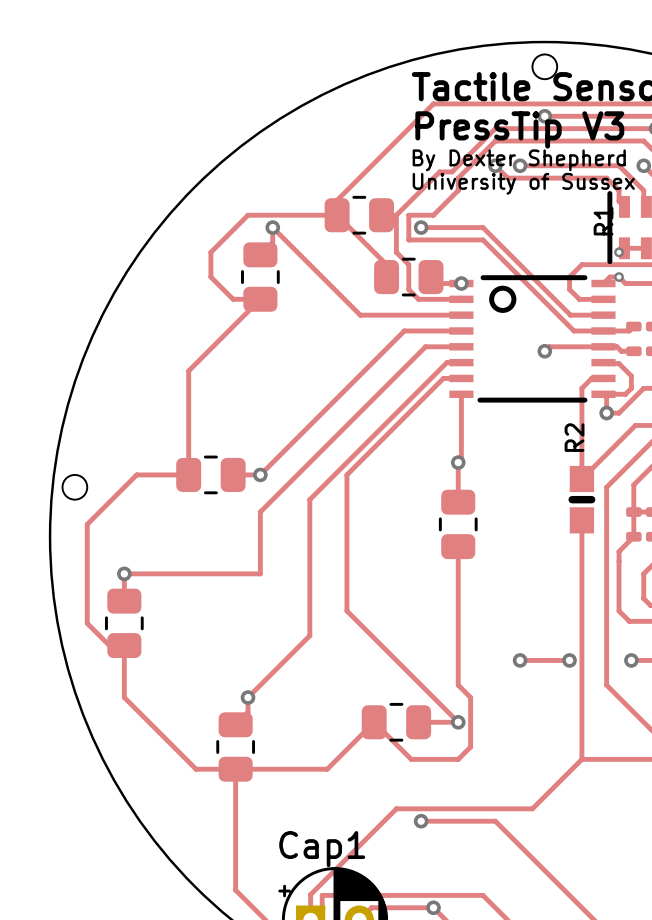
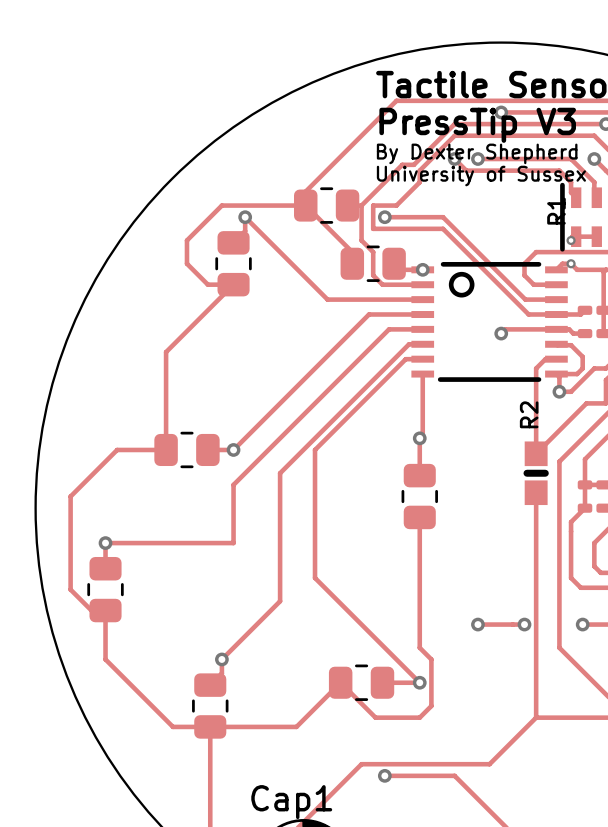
round board edge: [531, 53, 558, 80] -> none
round board edge: [61, 474, 88, 501] -> none

